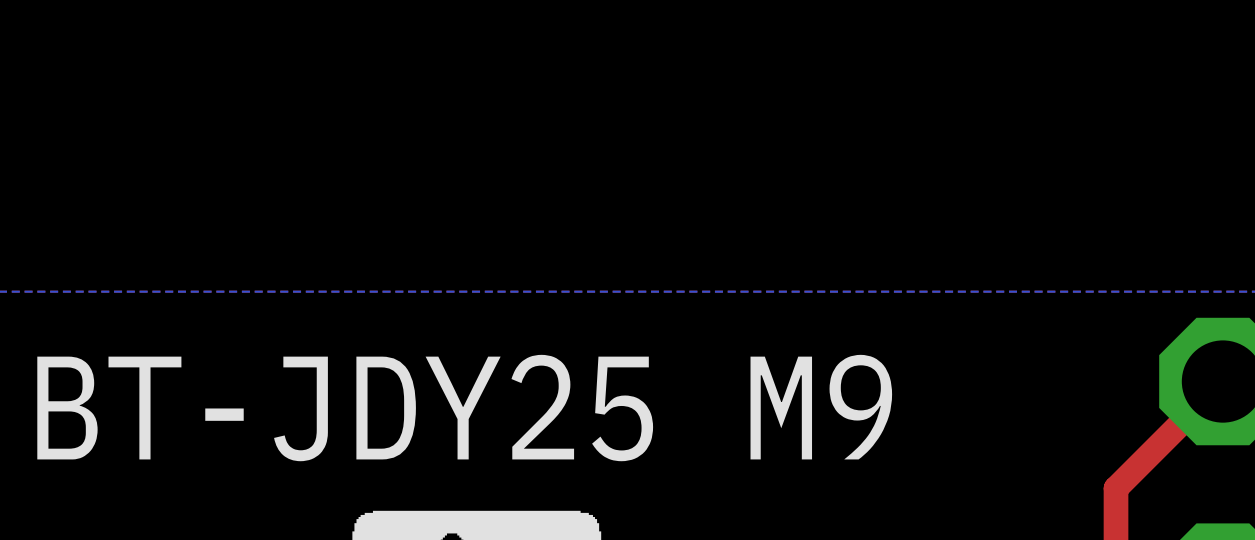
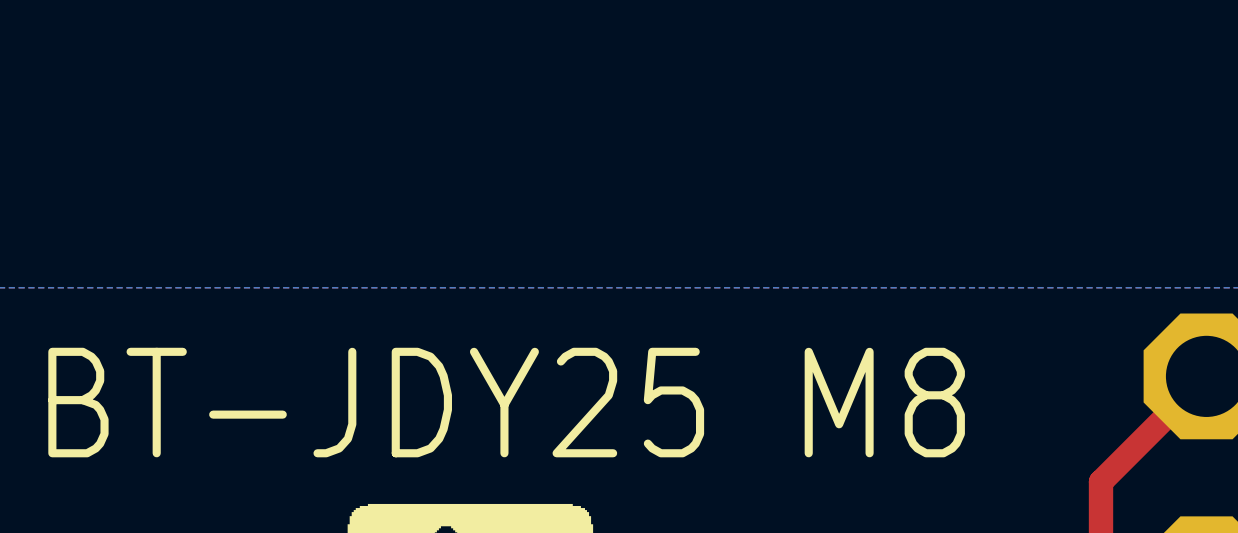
text: BT-JDY25 M9 (464, 408) -> BT-JDY25 M8 (506, 402)

